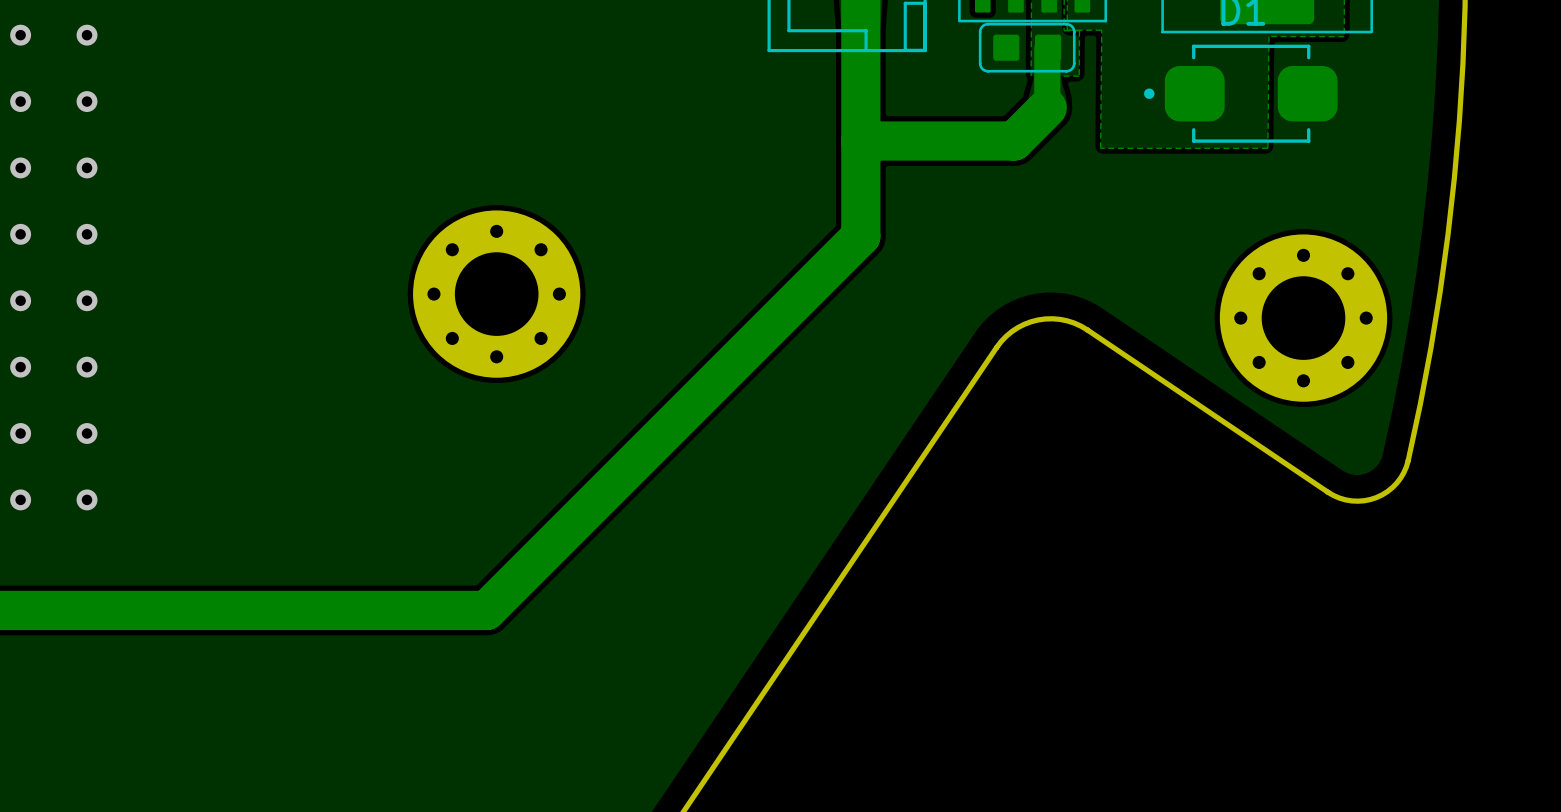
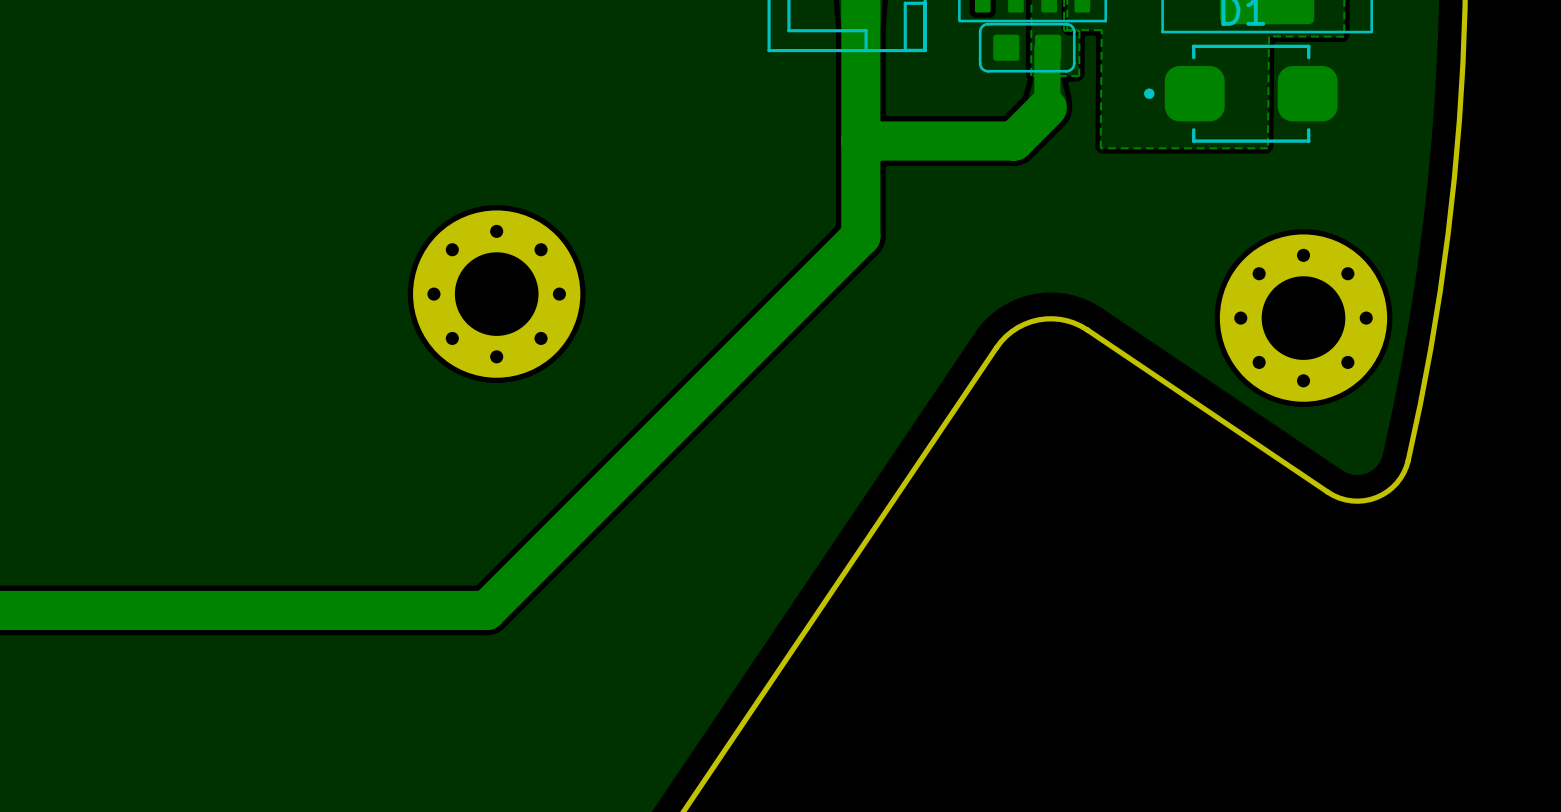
via: (20, 35) -> none
via: (87, 35) -> none
via: (20, 101) -> none
via: (87, 101) -> none
via: (20, 167) -> none
via: (87, 167) -> none
via: (20, 234) -> none
via: (87, 234) -> none
via: (20, 300) -> none
via: (87, 300) -> none
via: (20, 367) -> none
via: (87, 367) -> none
via: (20, 433) -> none
via: (87, 433) -> none
via: (20, 499) -> none
via: (87, 499) -> none

